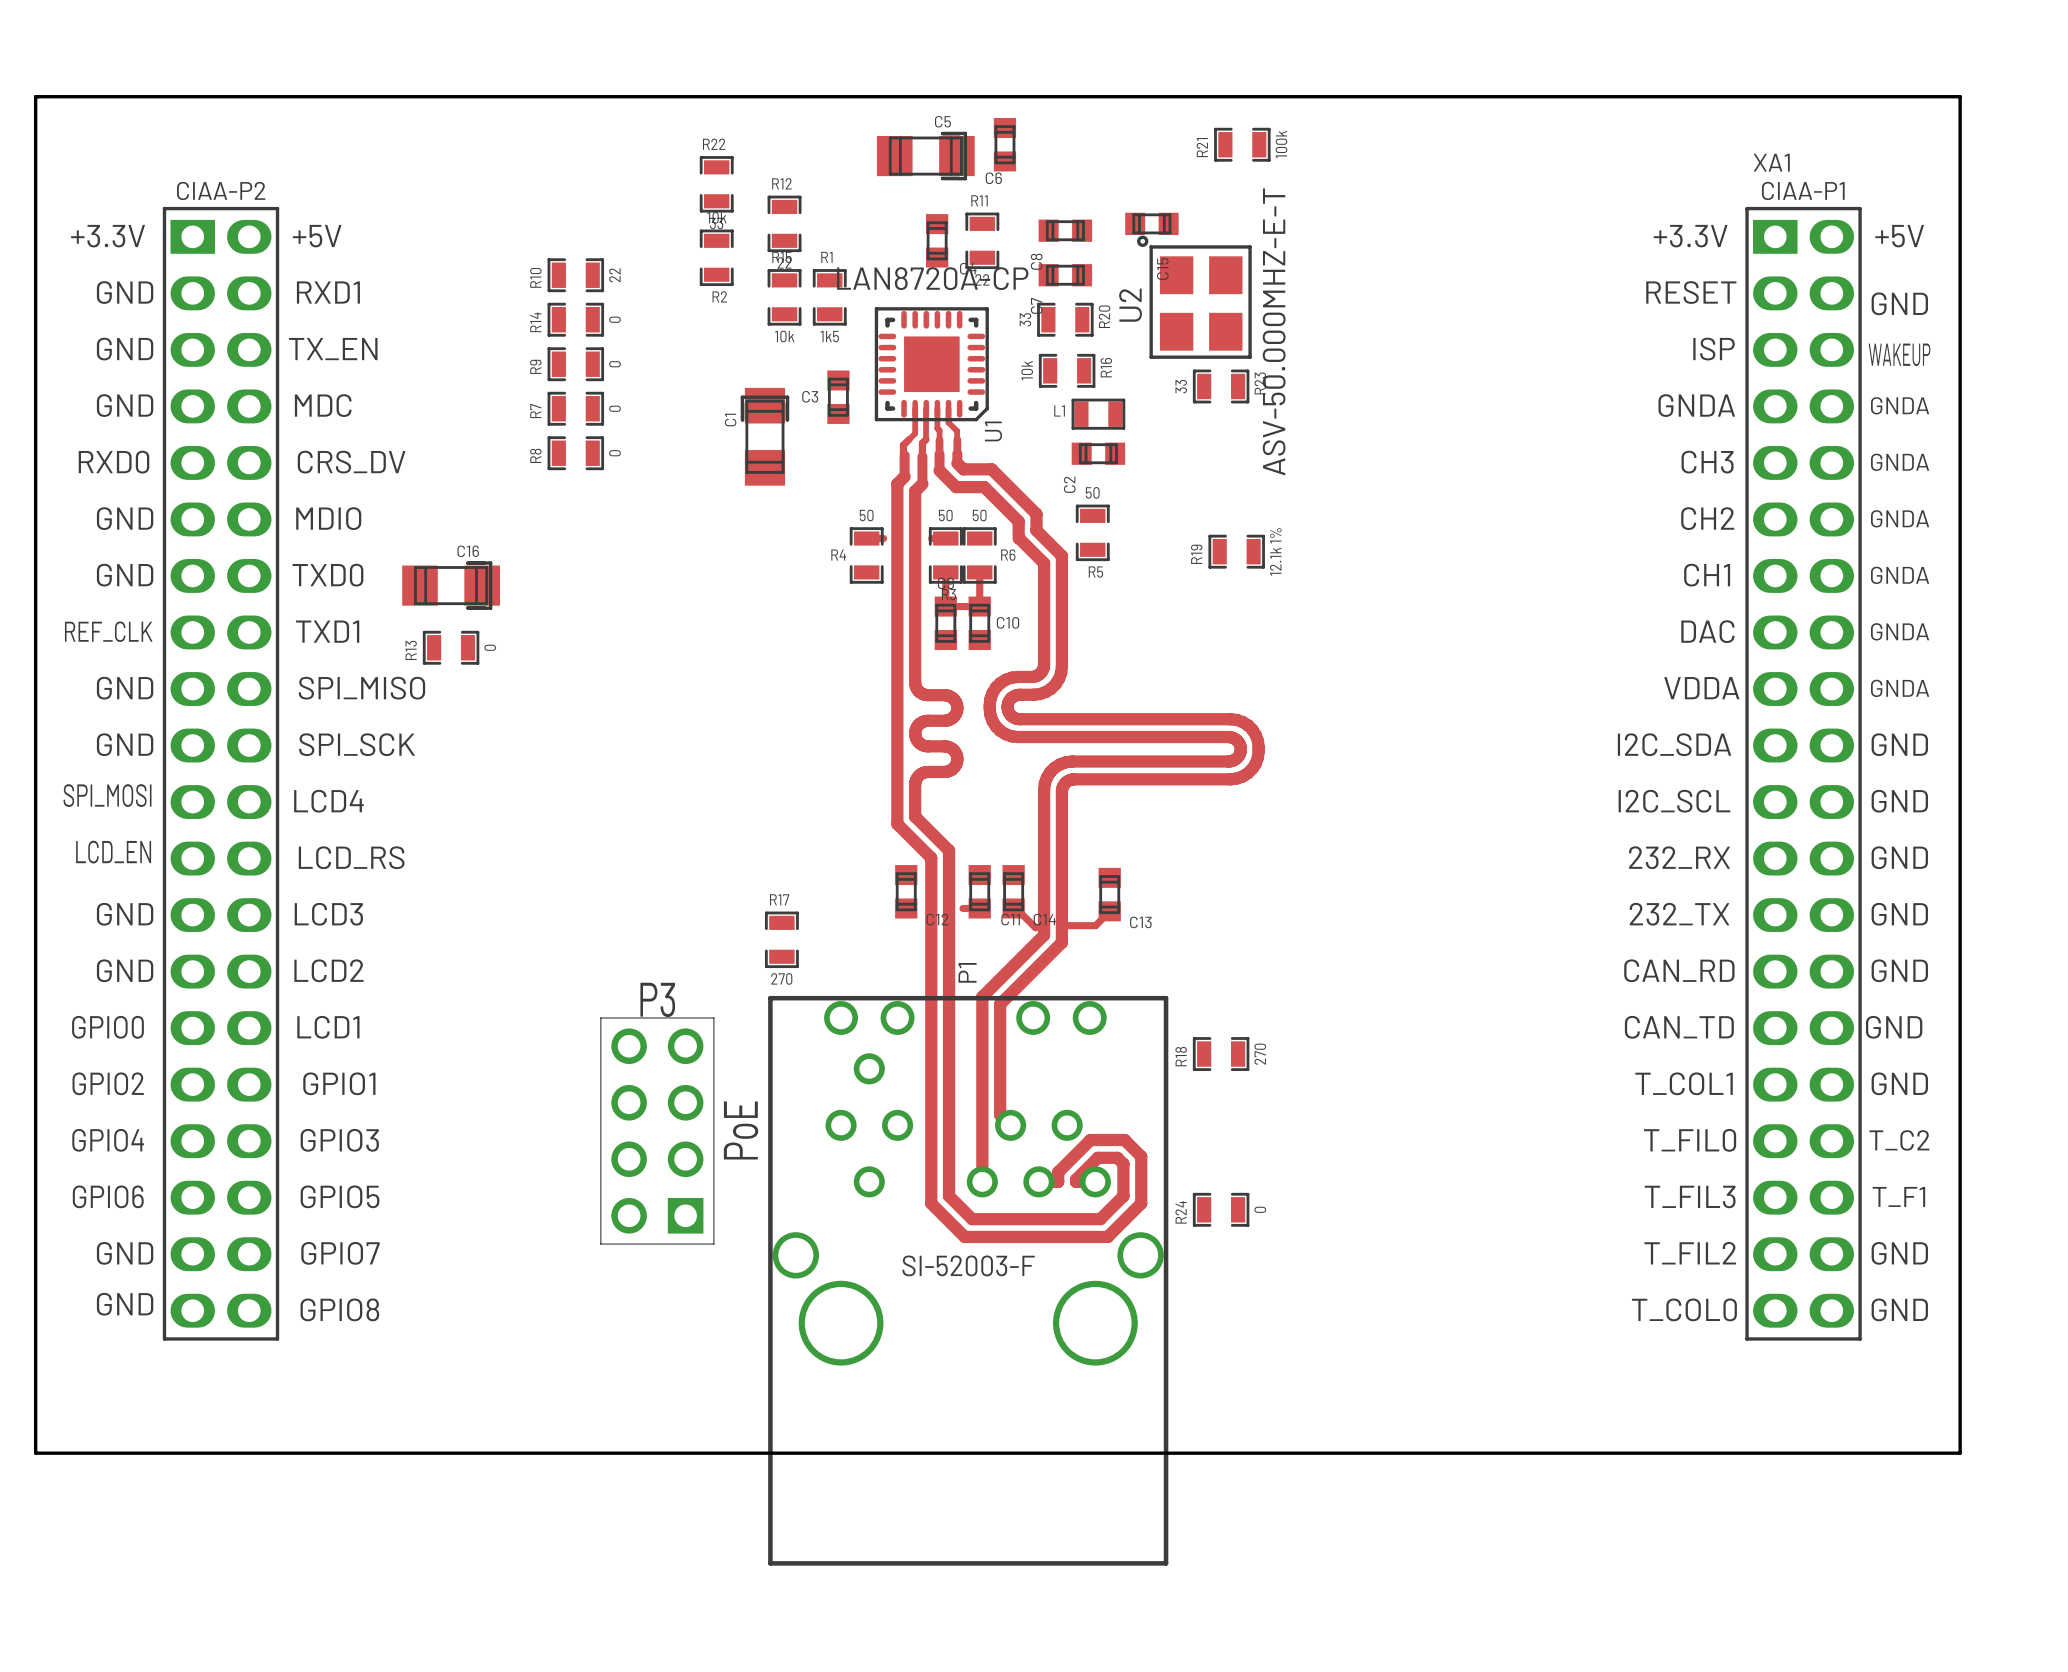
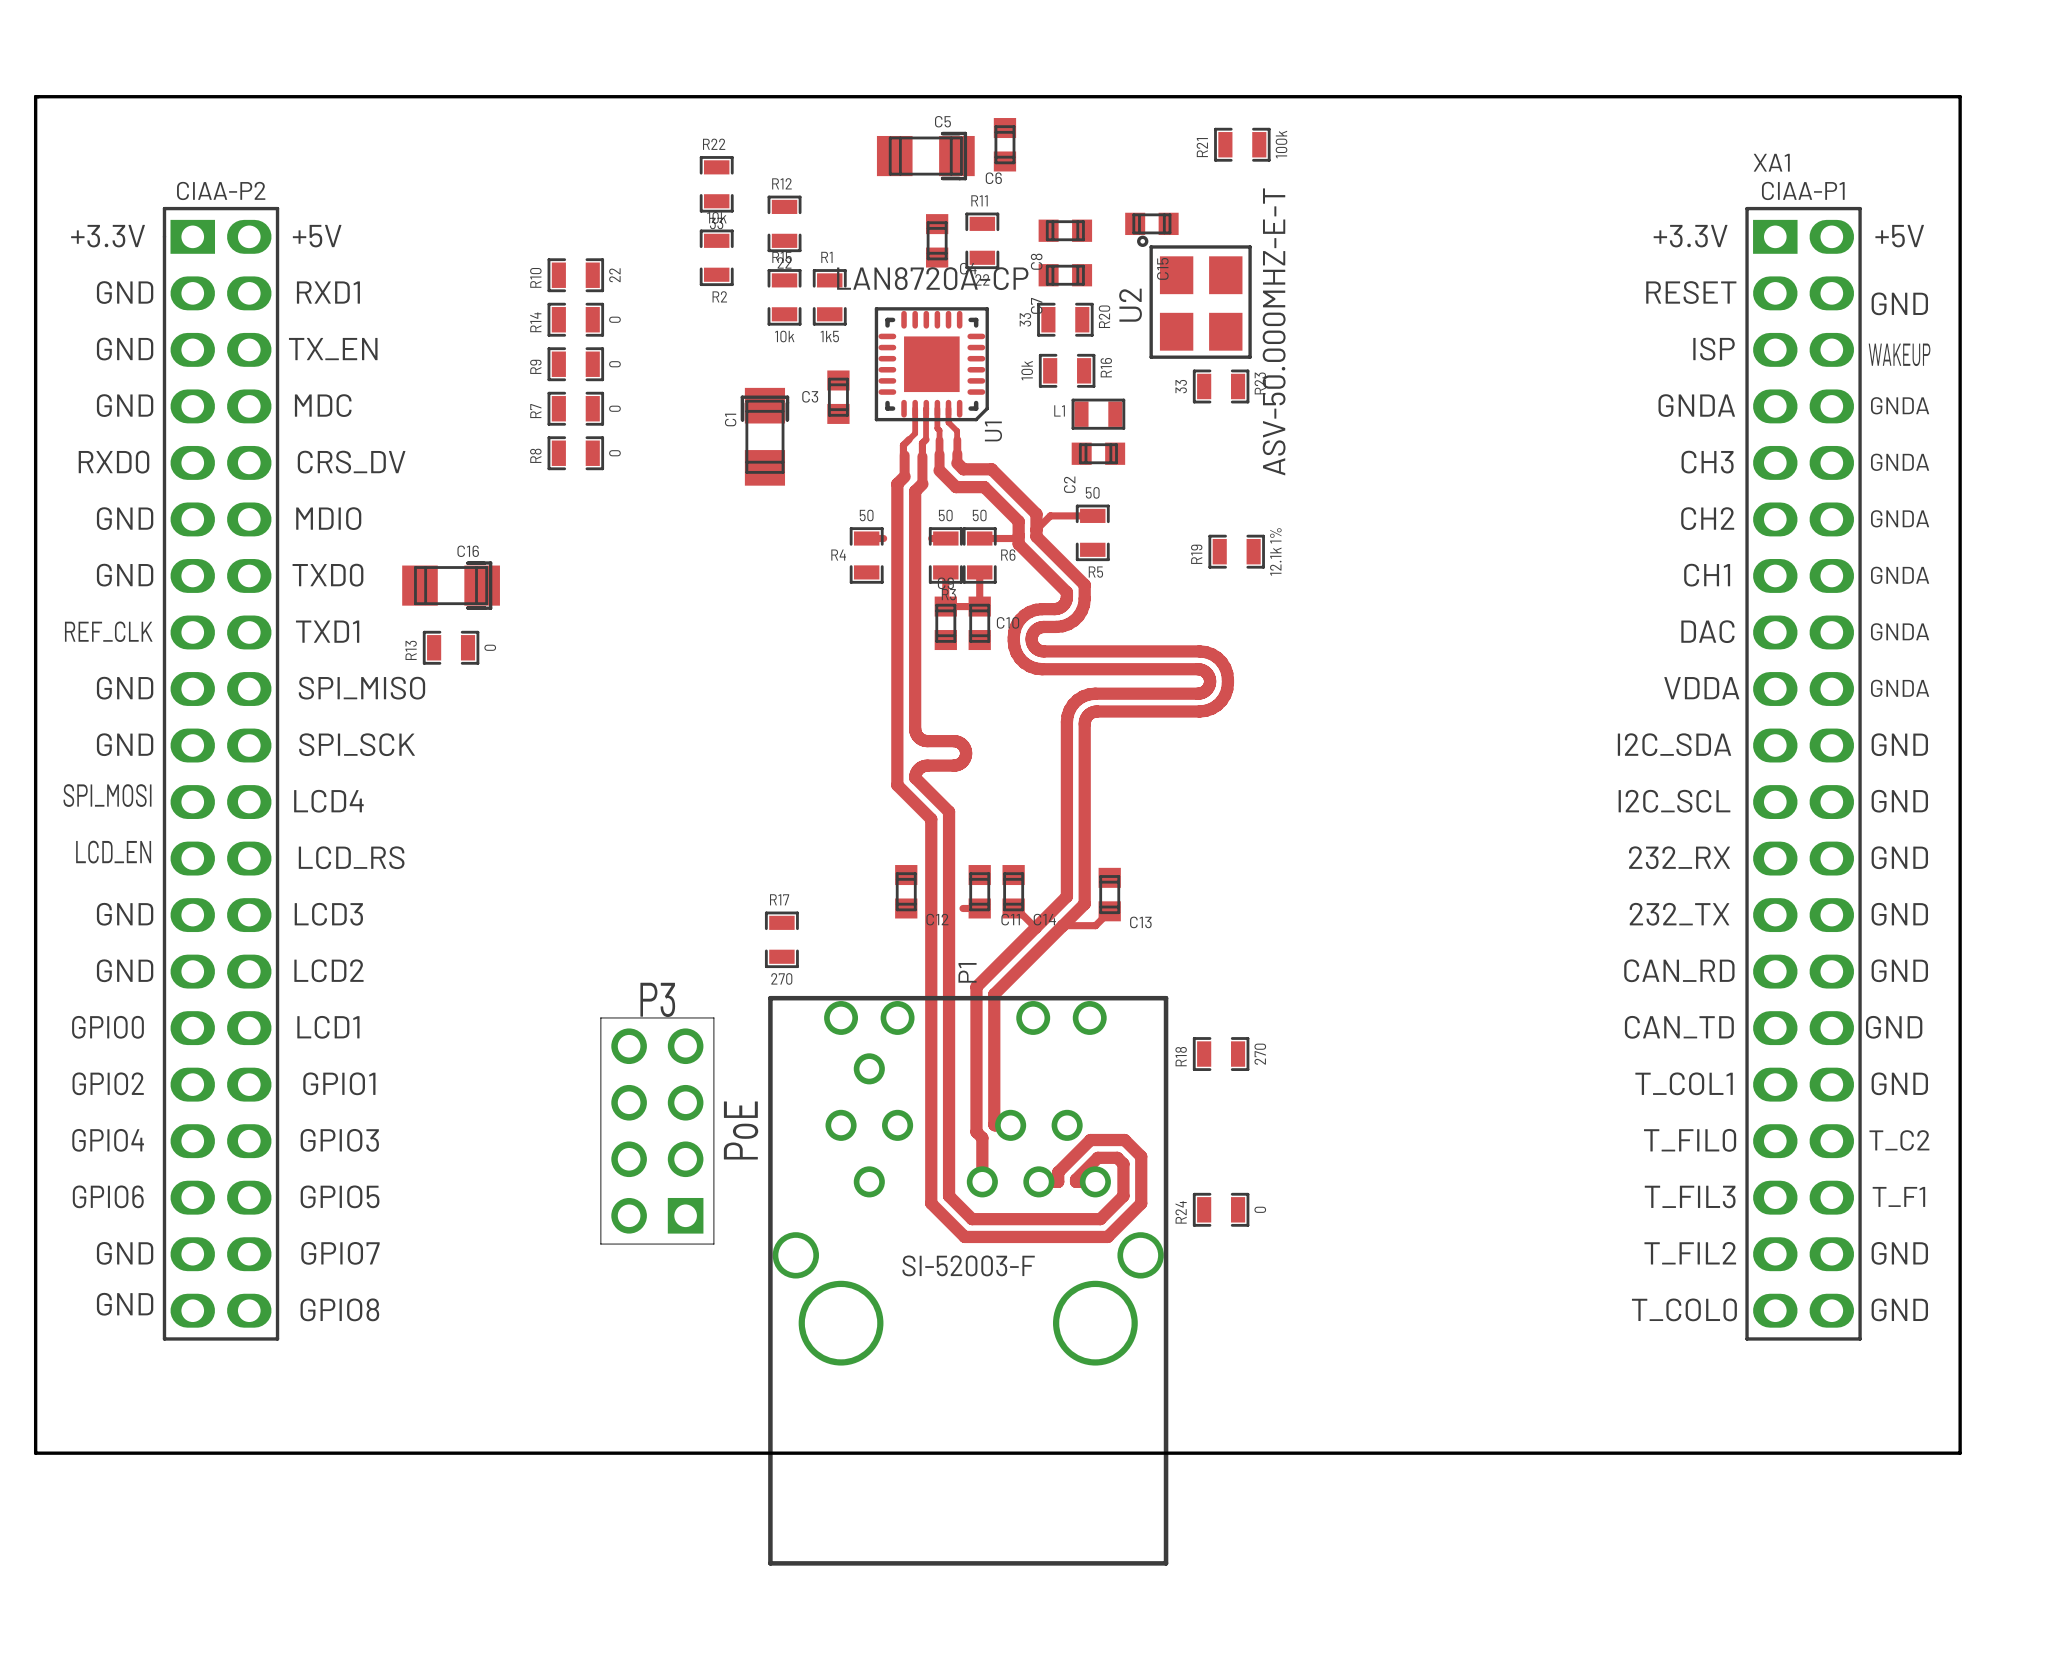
top track: none -> (1092, 515) (1050, 515) (1036, 529)
top track: (1036, 530) (1061, 555) (1061, 672) (1055, 684) (1045, 691) (1017, 695) (1012, 697) (1007, 707) (1012, 716) (1019, 719) (1236, 719) (1252, 729) (1257, 741) (1258, 751) (1252, 768) (1236, 778) (1074, 779) (1064, 783) (1061, 791) (1061, 942) (1000, 1004) (1000, 1114) (1010, 1125) -> (1036, 530) (1036, 536) (1084, 584) (1084, 598) (1081, 610) (1074, 620) (1062, 626) (1041, 627) (1034, 631) (1031, 641) (1036, 648) (1043, 651) (1205, 652) (1221, 662) (1227, 673) (1227, 683) (1221, 700) (1205, 710) (1096, 711) (1089, 714) (1085, 718) (1084, 903) (994, 994) (994, 1124) (1010, 1125)
top track: none -> (979, 538) (1018, 538)
top track: (1018, 538) (1044, 563) (1044, 664) (1041, 672) (1037, 675) (1011, 677) (995, 687) (990, 698) (989, 708) (992, 721) (1000, 730) (1018, 737) (1228, 737) (1238, 741) (1240, 749) (1238, 756) (1231, 761) (1072, 761) (1060, 764) (1050, 772) (1044, 789) (1044, 935) (982, 996) (982, 1137) -> (1018, 535) (1018, 544) (1066, 592) (1066, 599) (1062, 606) (1057, 608) (1029, 611) (1016, 625) (1013, 637) (1014, 647) (1024, 663) (1042, 669) (1197, 669) (1207, 673) (1210, 681) (1207, 689) (1197, 693) (1088, 694) (1077, 699) (1069, 709) (1066, 722) (1066, 896) (976, 986) (976, 1132) (982, 1137)
top track: (915, 682) (916, 687) (922, 693) (947, 695) (952, 697) (957, 705) (956, 713) (952, 717) (947, 720) (922, 722) (916, 728) (915, 733) (916, 739) (922, 745) (947, 746) (952, 749) (957, 756) (956, 764) (952, 769) (947, 771) (922, 773) (916, 779) (915, 784) (915, 816) (949, 850) -> (915, 682) (915, 728) (917, 736) (924, 740) (956, 741) (961, 743) (965, 750) (964, 758) (959, 764) (924, 765) (917, 770) (915, 775) (915, 777) (949, 811) (949, 850)
top track: (897, 785) (897, 824) (931, 857) -> (897, 785) (931, 819) (931, 857)

